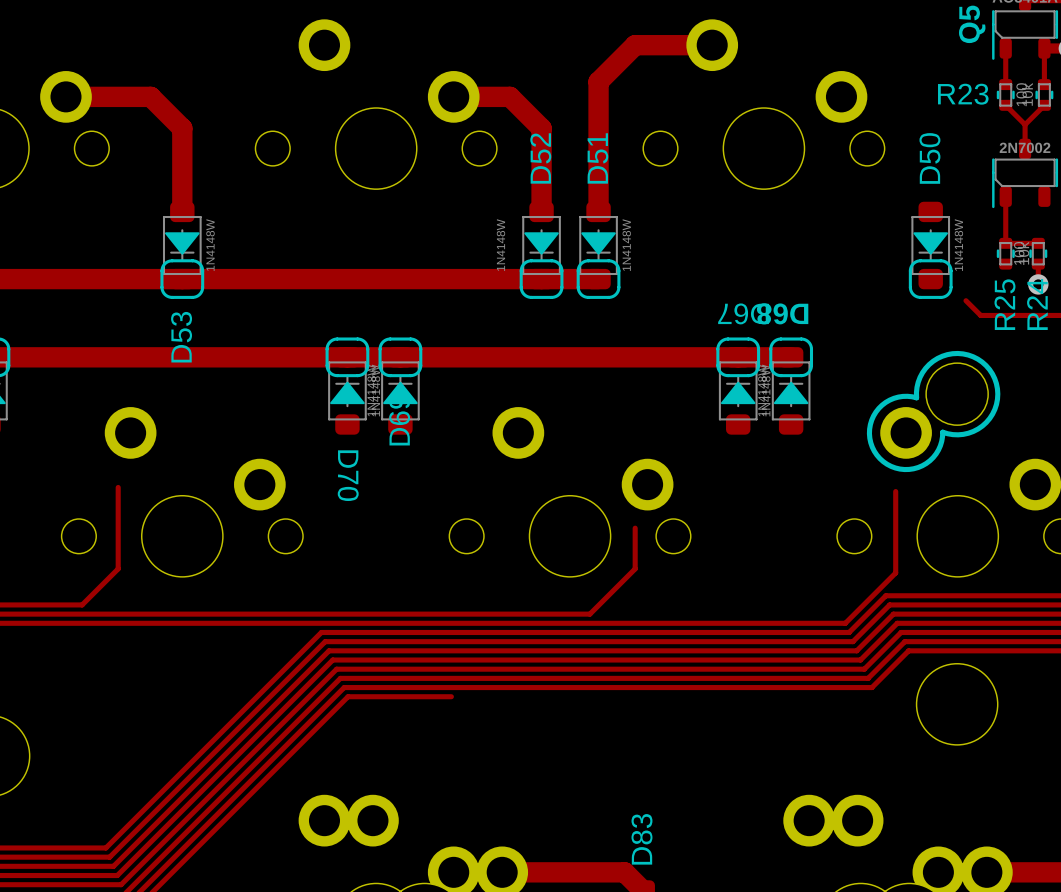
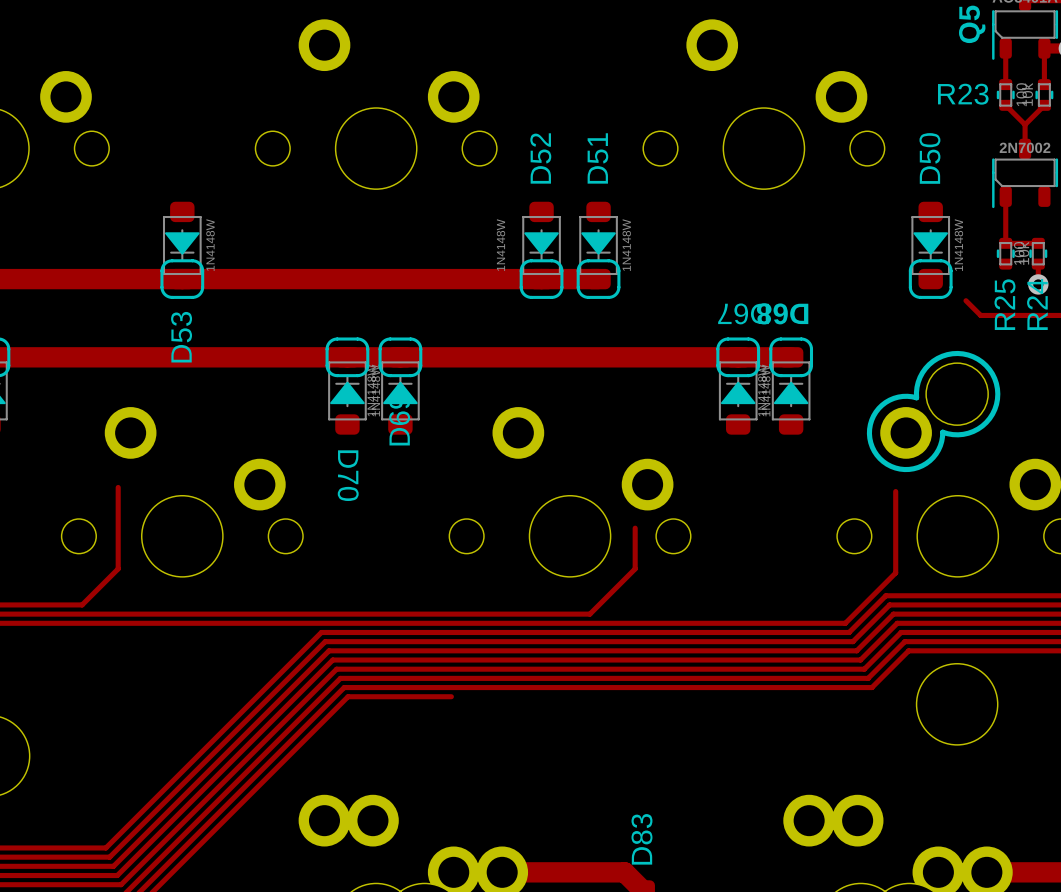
track: (712, 45) (635, 45) (598, 81) (598, 211) -> none
track: (65, 96) (150, 96) (182, 128) (182, 211) -> none
track: (453, 96) (510, 96) (541, 128) (541, 211) -> none

